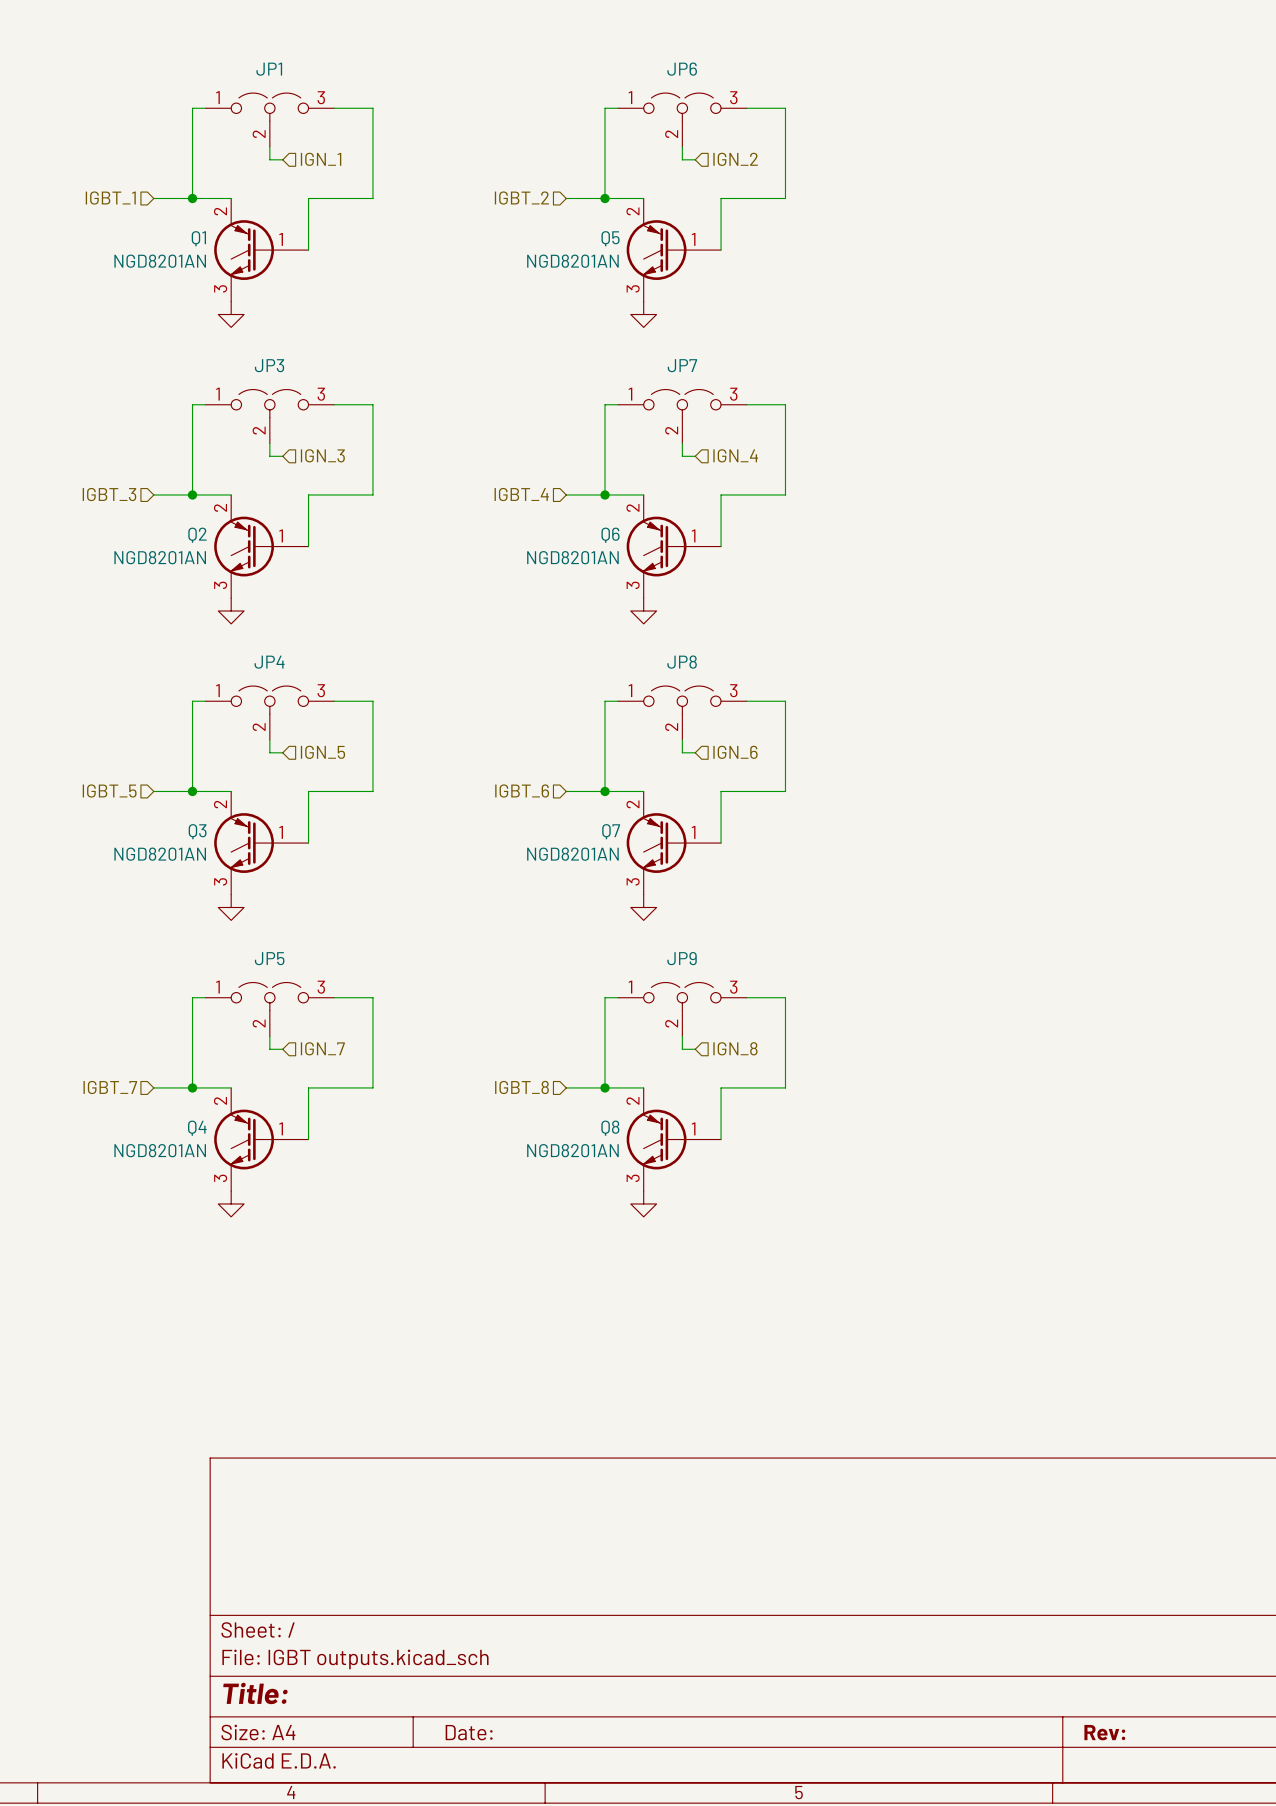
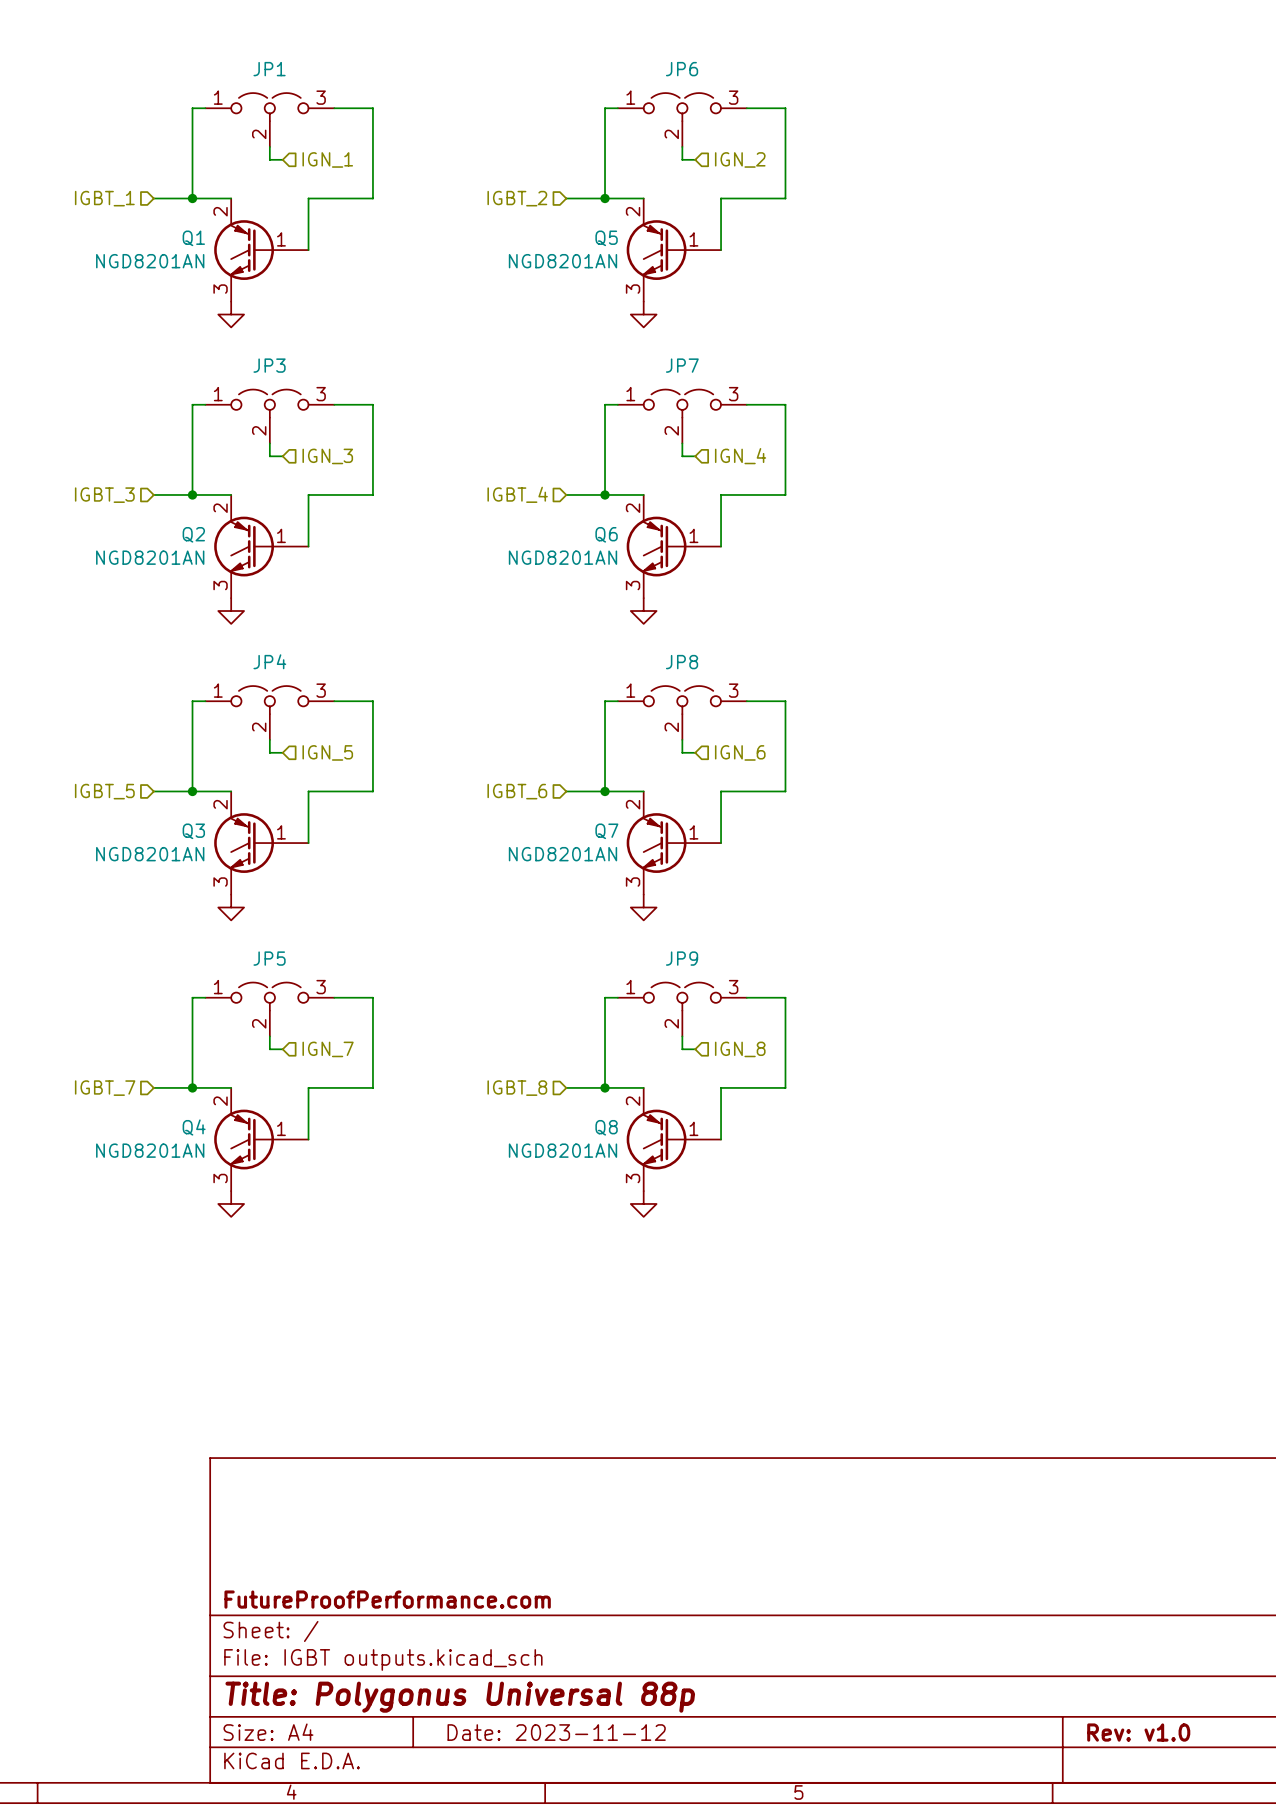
title block: none -> FutureProofPerformance.com (387, 1599)
title block: Title: (255, 1693) -> Title: Polygonus Universal 88p (460, 1697)
title block: Date: (469, 1732) -> Date: 2023-11-12 (556, 1732)
title block: Rev: (1104, 1732) -> Rev: v1.0 (1138, 1732)

